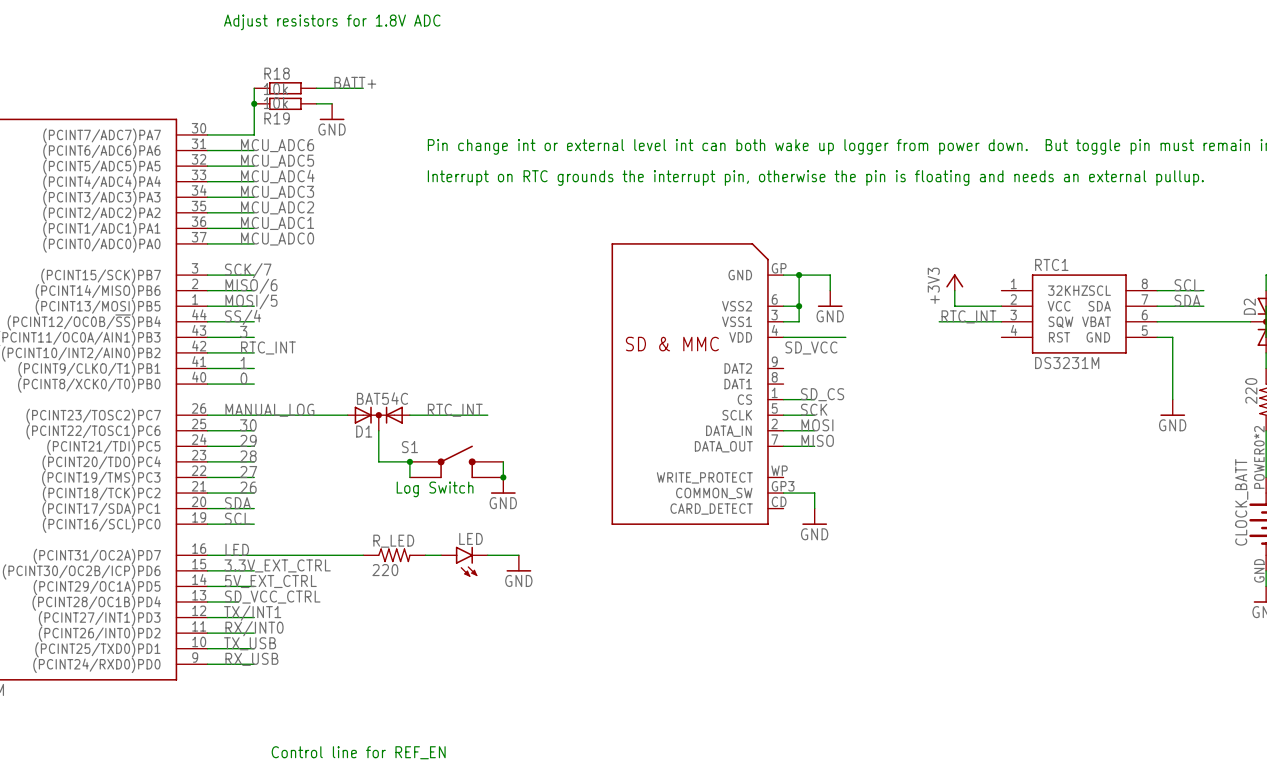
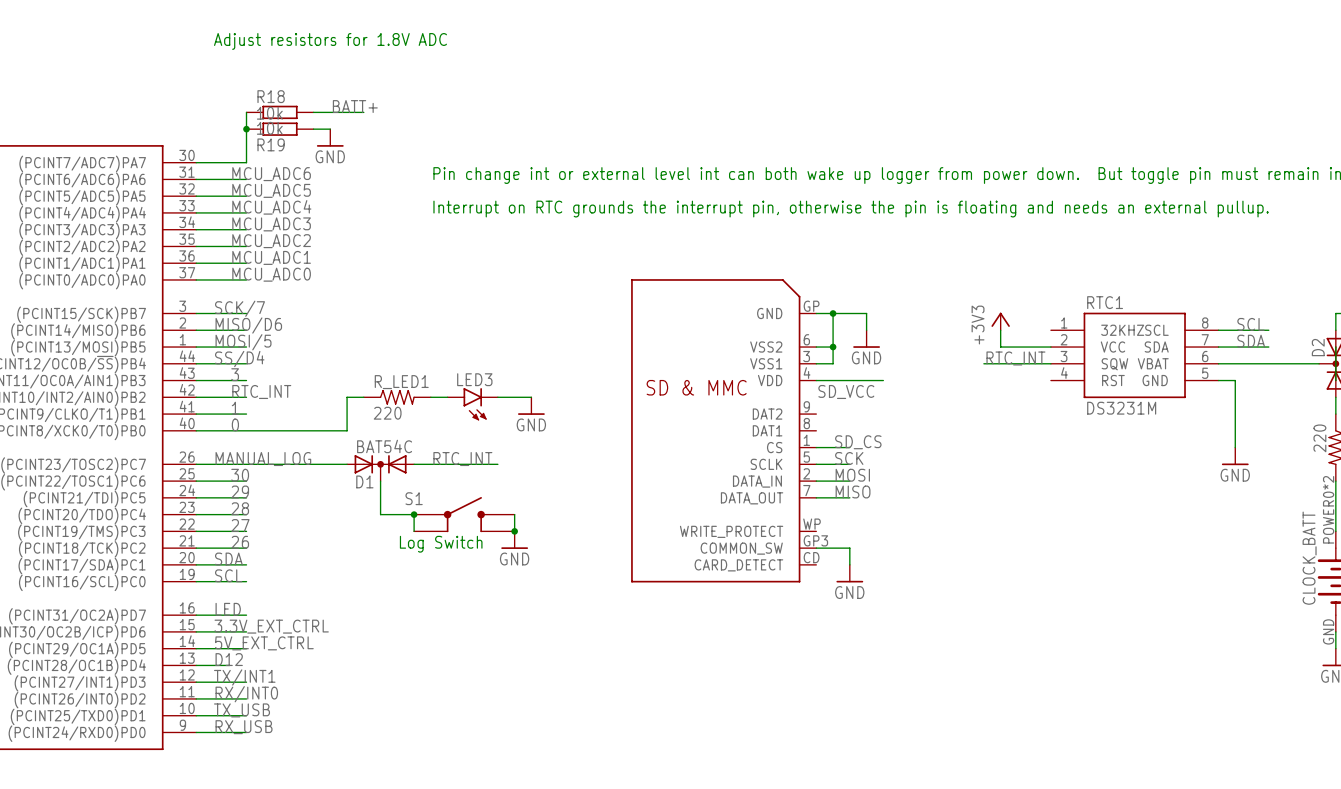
label: MISO/6 (251, 286) -> MISO/D6 (248, 325)
label: SS/4 (243, 317) -> SS/D4 (239, 359)
wire: none -> (363, 397) (347, 397) (347, 430) (246, 430)
R_LED1: none -> 220 (397, 397)
wire: none -> (430, 397) (447, 397)
wire: none -> (497, 397) (531, 397)
LED3: none -> (472, 404)
power symbol: none -> GND (531, 406)
wire: (254, 555) (363, 555) -> none
R_LED: 220 (394, 555) -> none
wire: (425, 555) (441, 555) -> none
wire: (487, 555) (518, 555) -> none
LED: (464, 561) -> none
power symbol: GND (518, 563) -> none
label: SD_VCC_CTRL (272, 597) -> D12 (229, 659)

